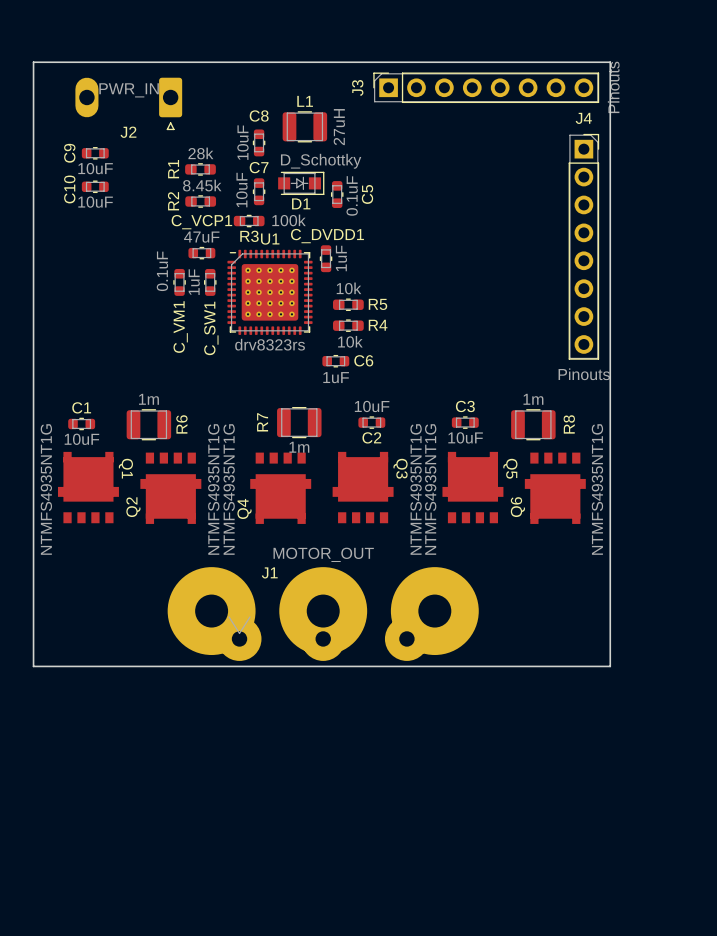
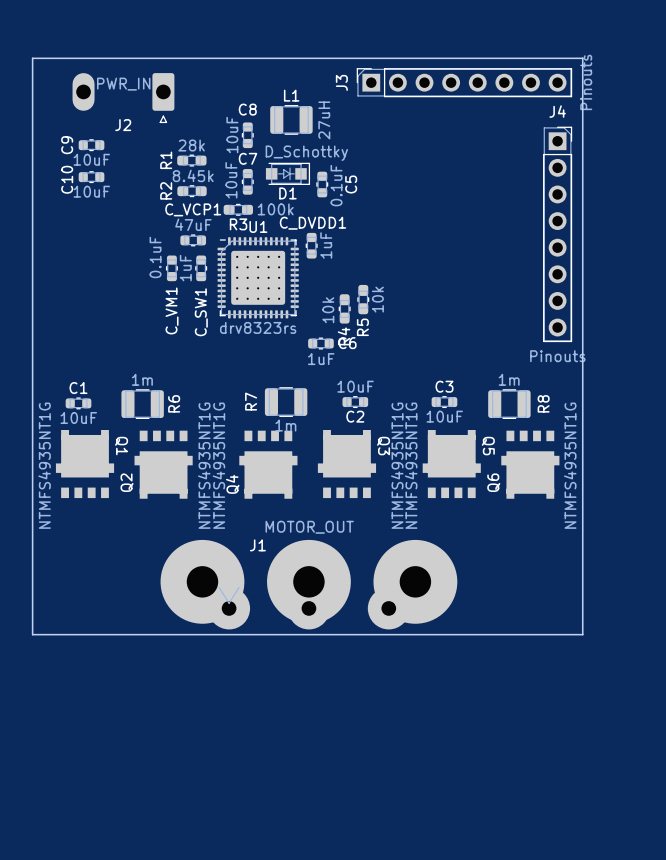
R5 rotation: 0° (348, 304) -> 90° clockwise (363, 299)
R5 position: (348, 304) -> (363, 299)
R4 rotation: 0° (348, 325) -> 90° clockwise (344, 308)

